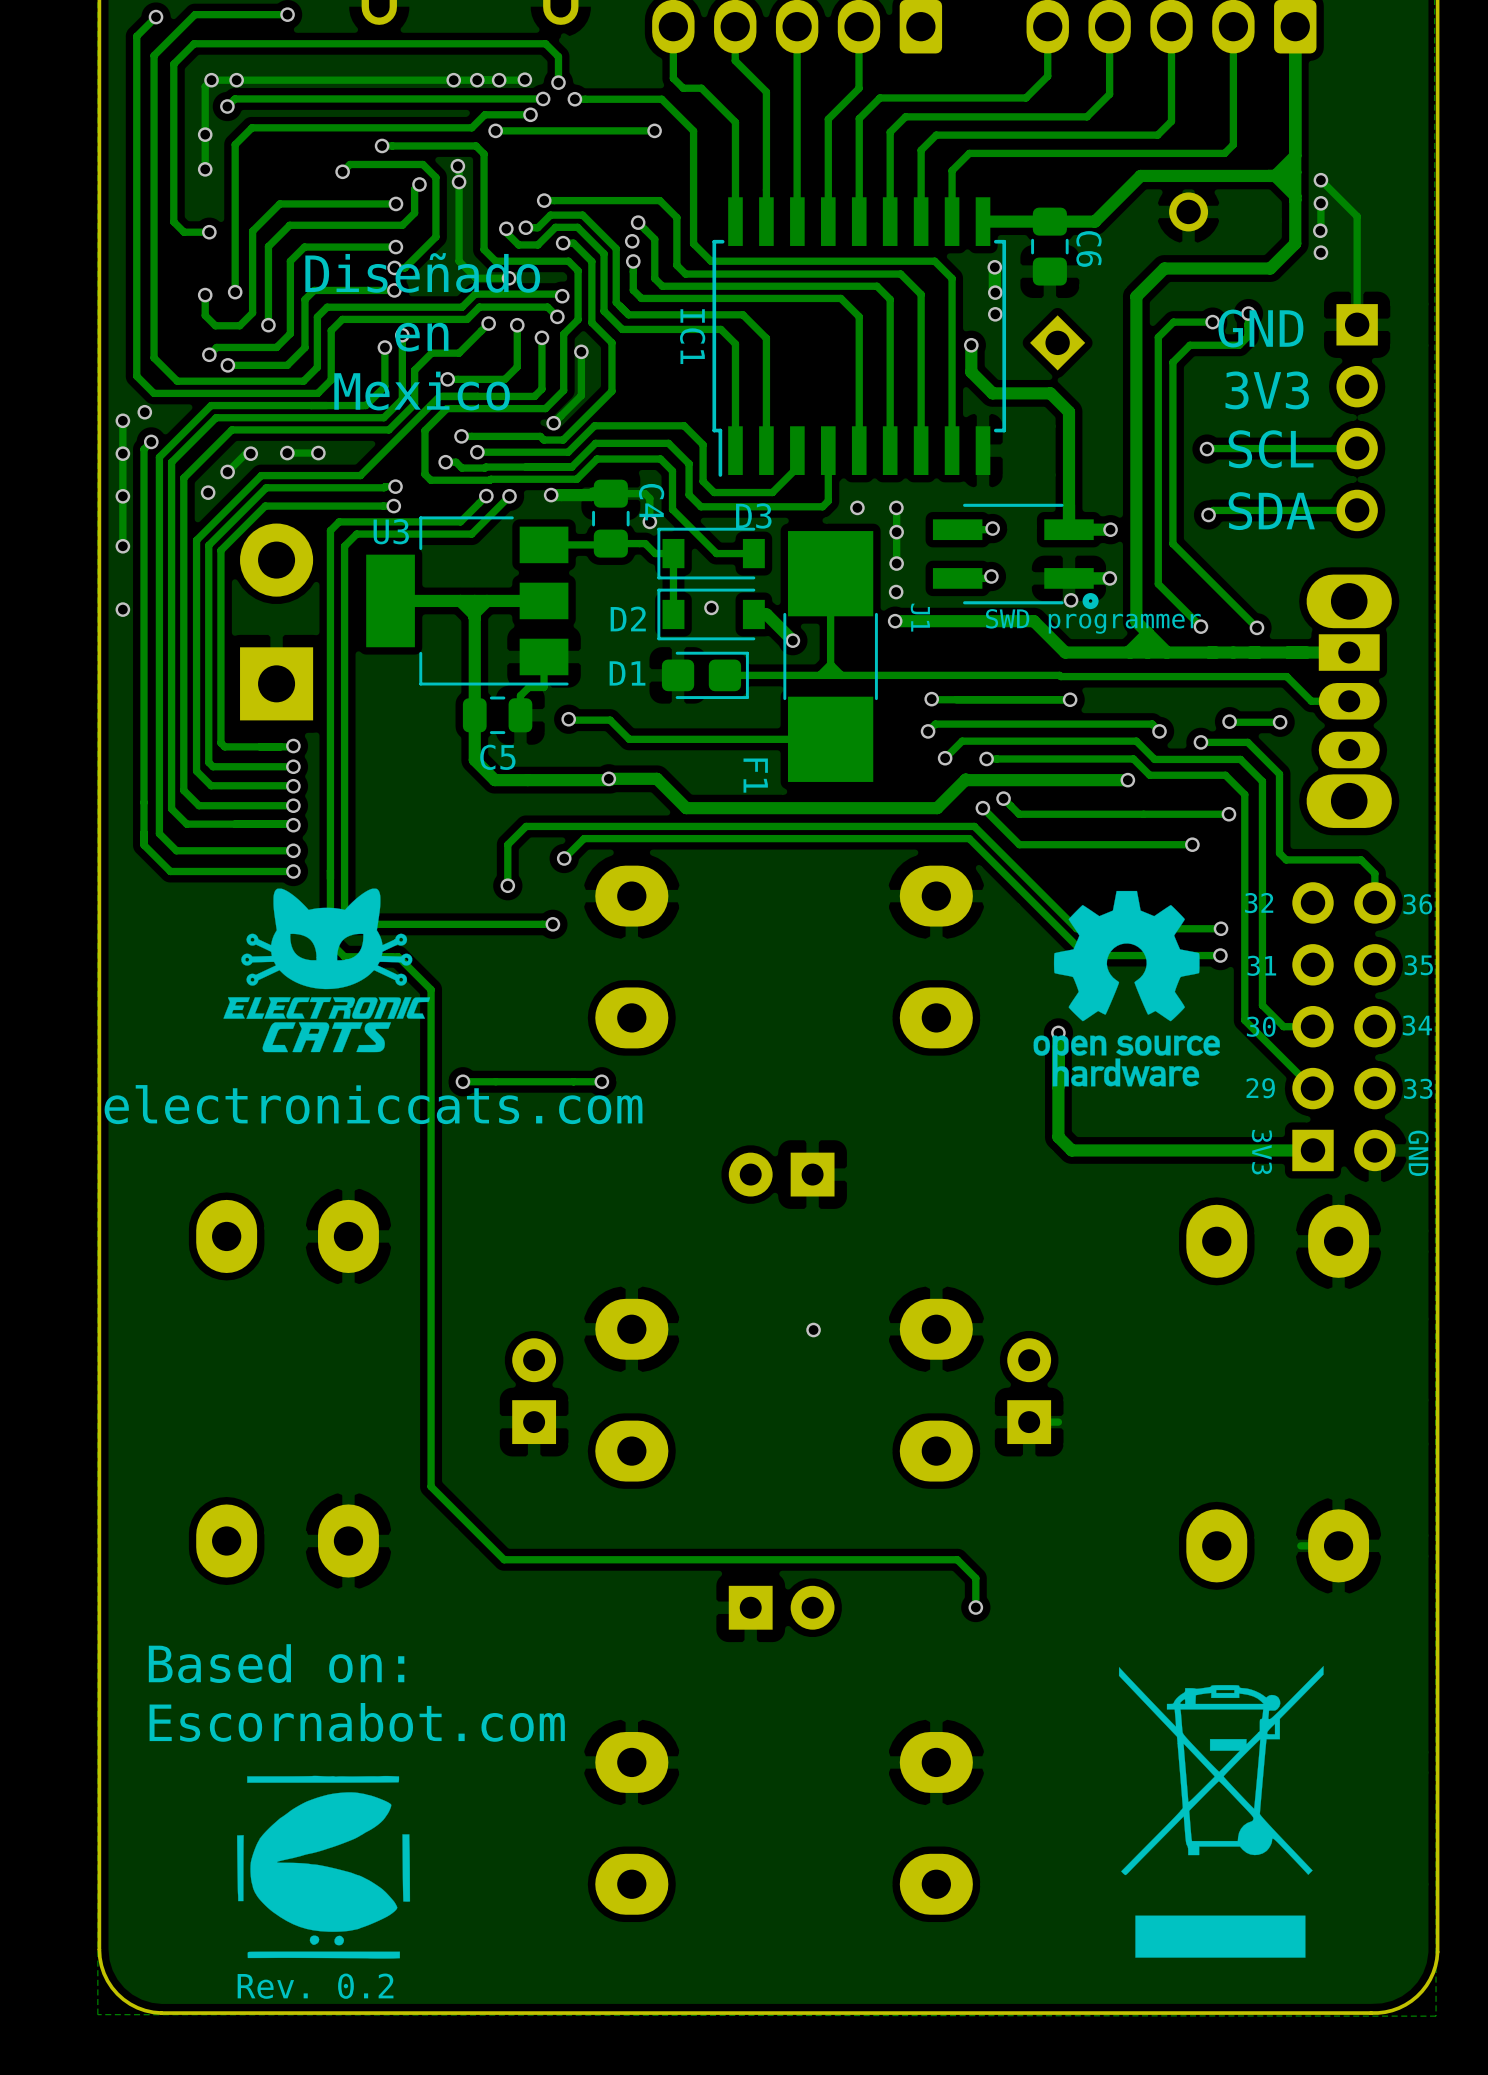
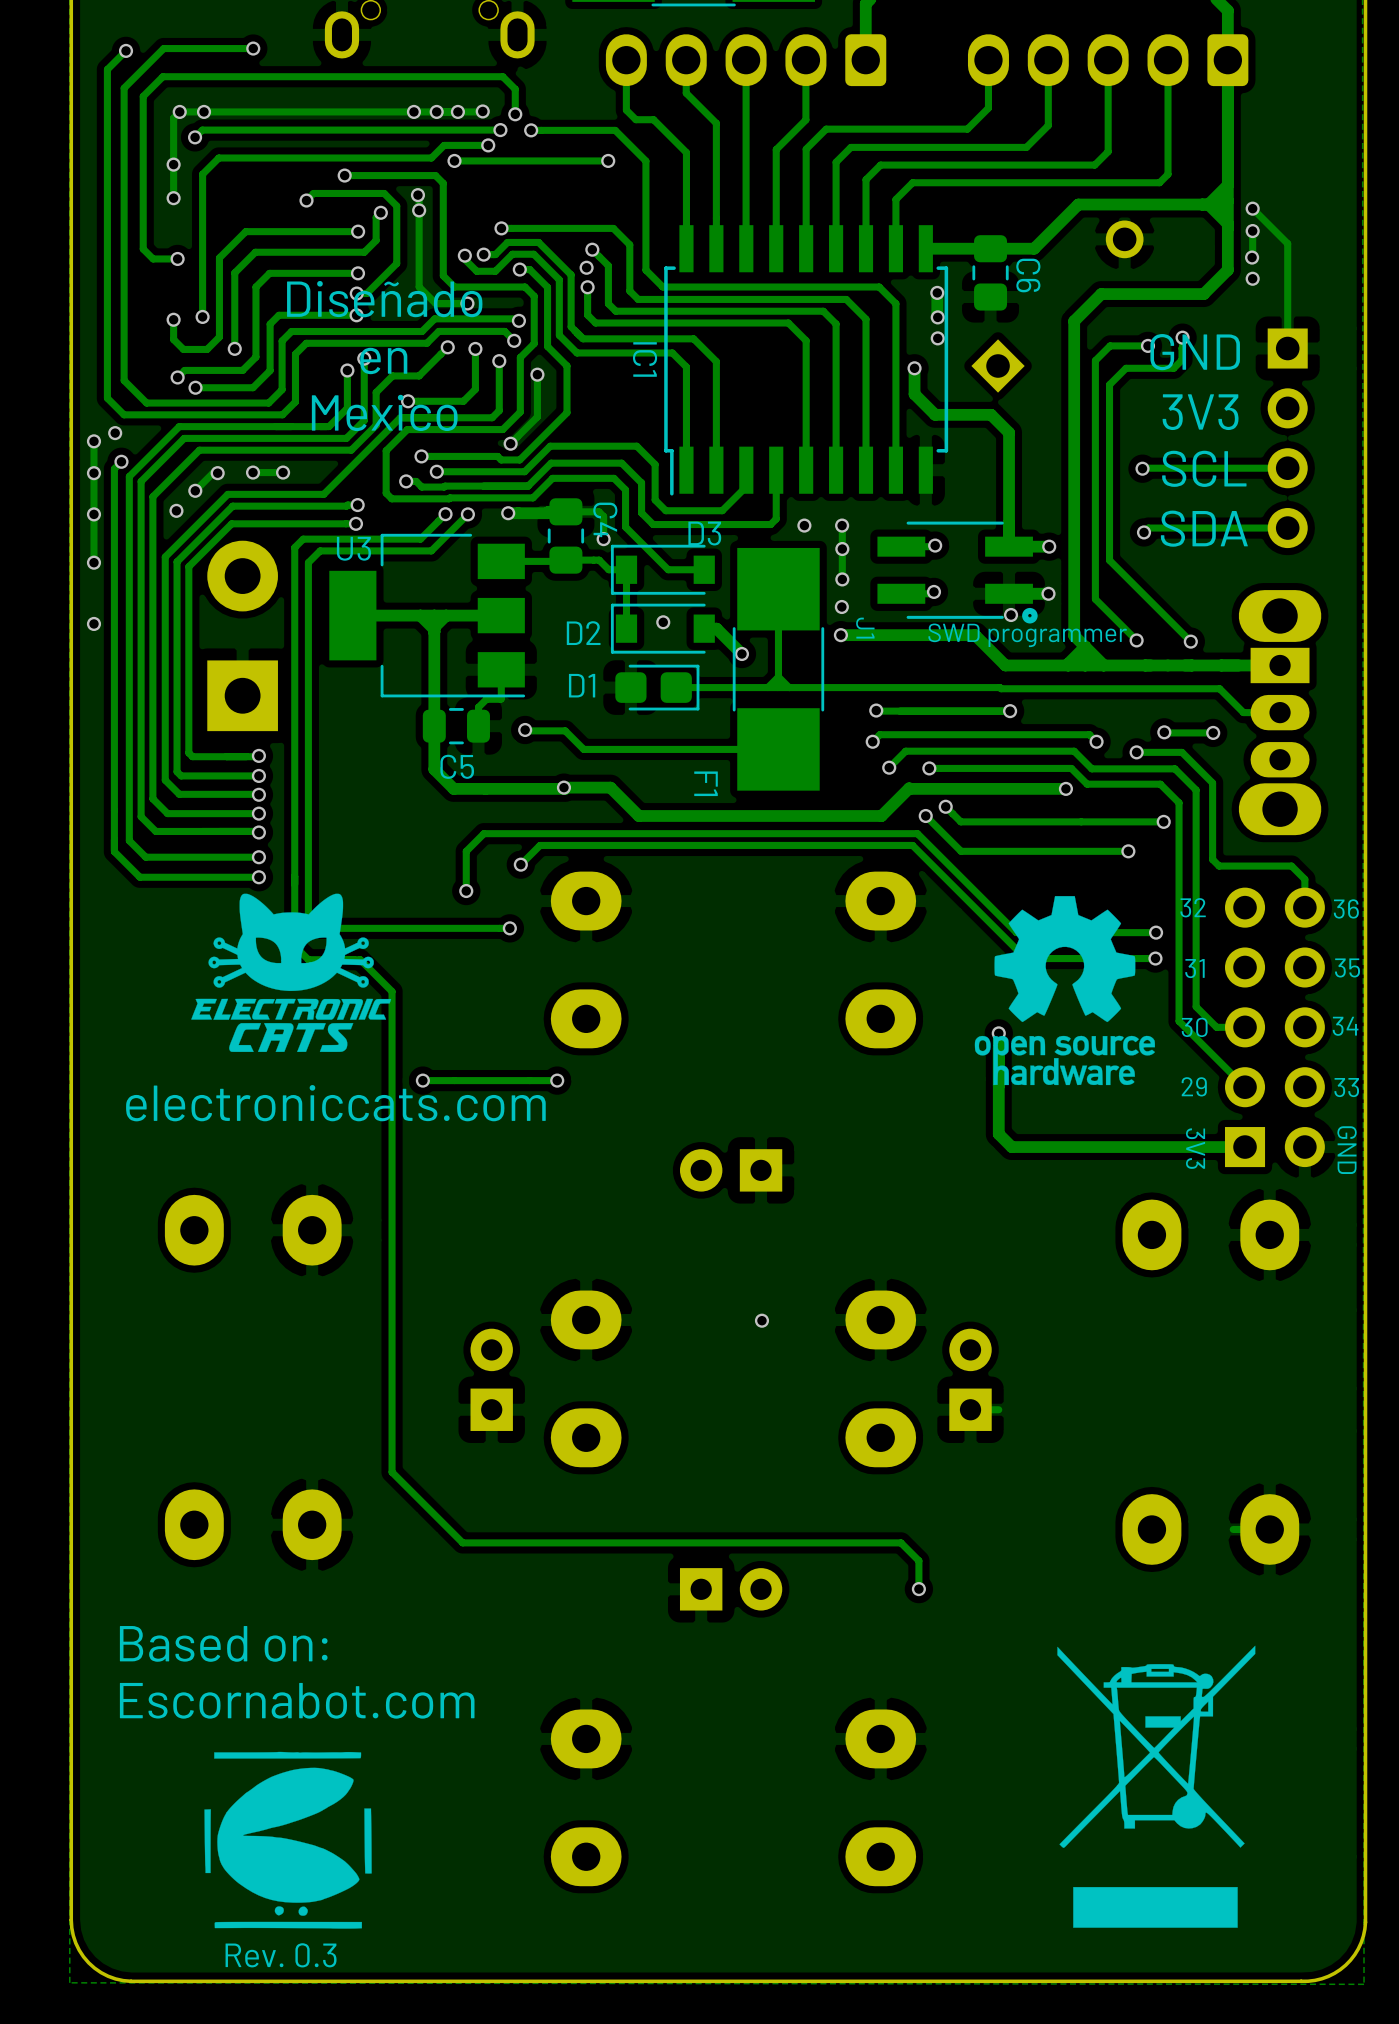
text: Rev. 0.2 (315, 1986) -> Rev. 0.3 (281, 1955)

